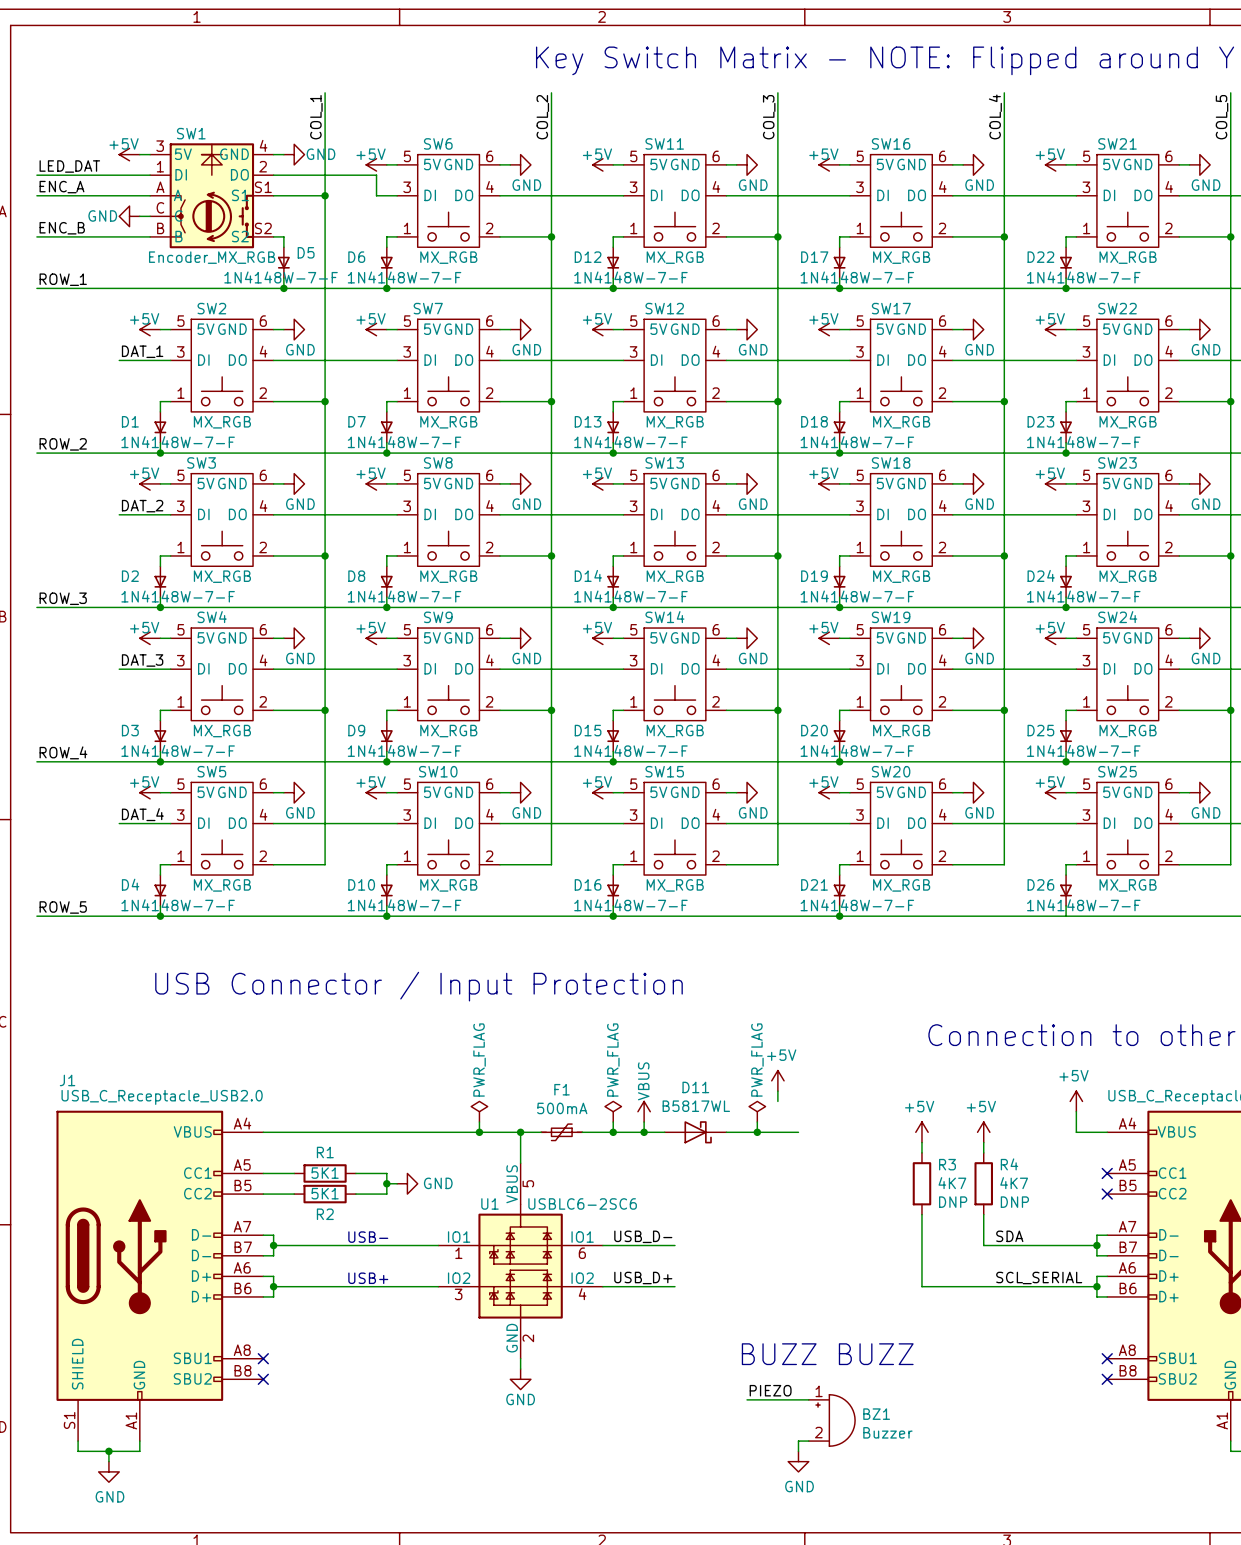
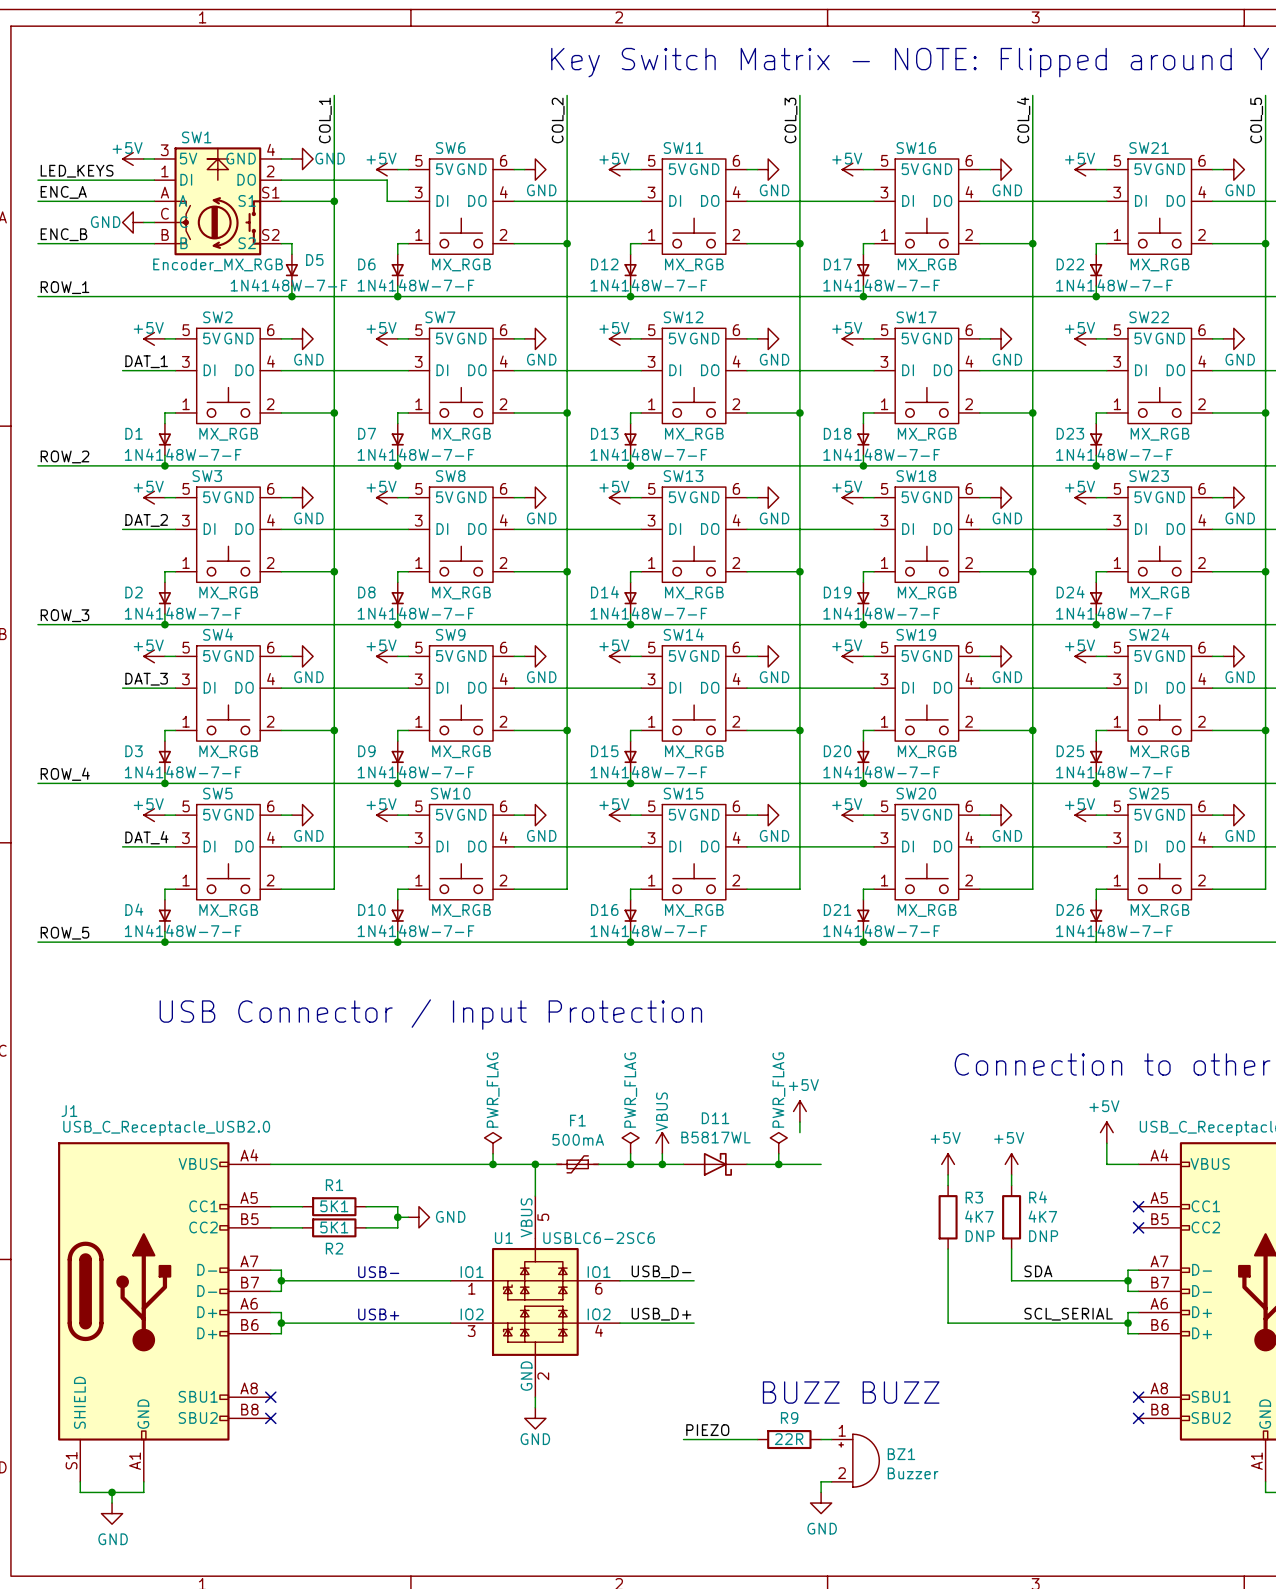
label: LED_DAT (69, 166) -> LED_KEYS (77, 171)
label position: PIEZO (770, 1390) -> PIEZO (707, 1430)
wire: none -> (683, 1439) (757, 1439)
wire: (747, 1399) (798, 1399) -> none
R9: none -> 22R (789, 1439)

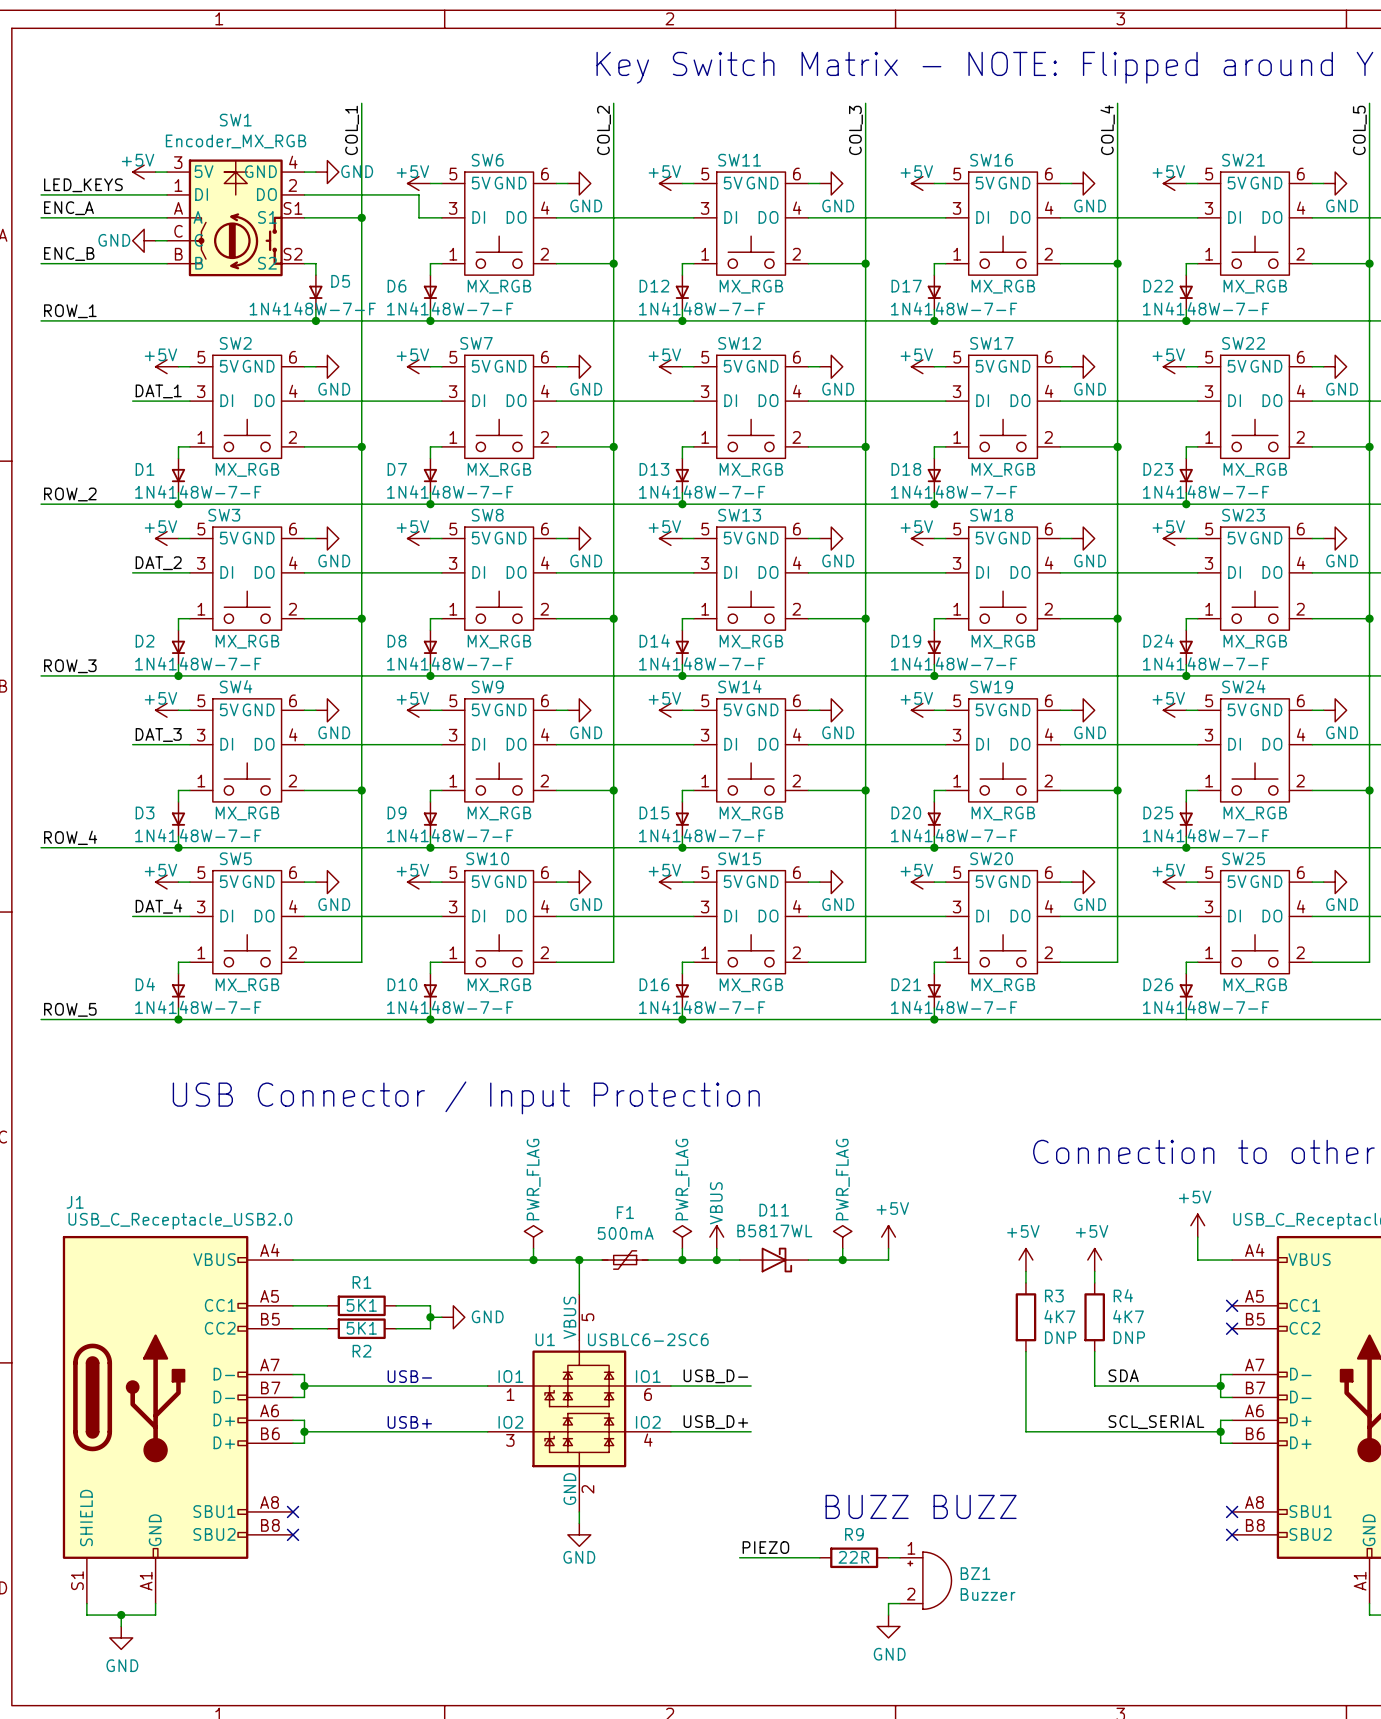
SW1 name position: SW1 (196, 137) -> SW1 (235, 120)
SW1 value position: Encoder_MX_RGB (218, 264) -> Encoder_MX_RGB (236, 141)
power symbol position: +5V (799, 1111) -> +5V (888, 1237)
wire: (799, 1122) (799, 1132) -> (888, 1248) (888, 1260)

